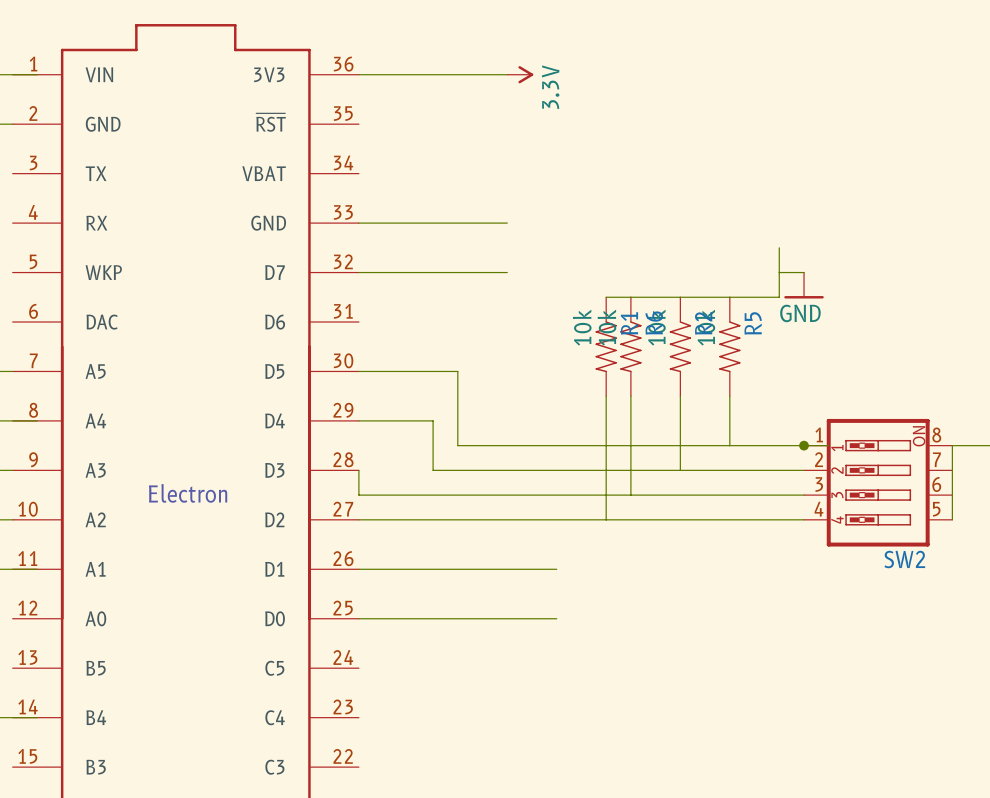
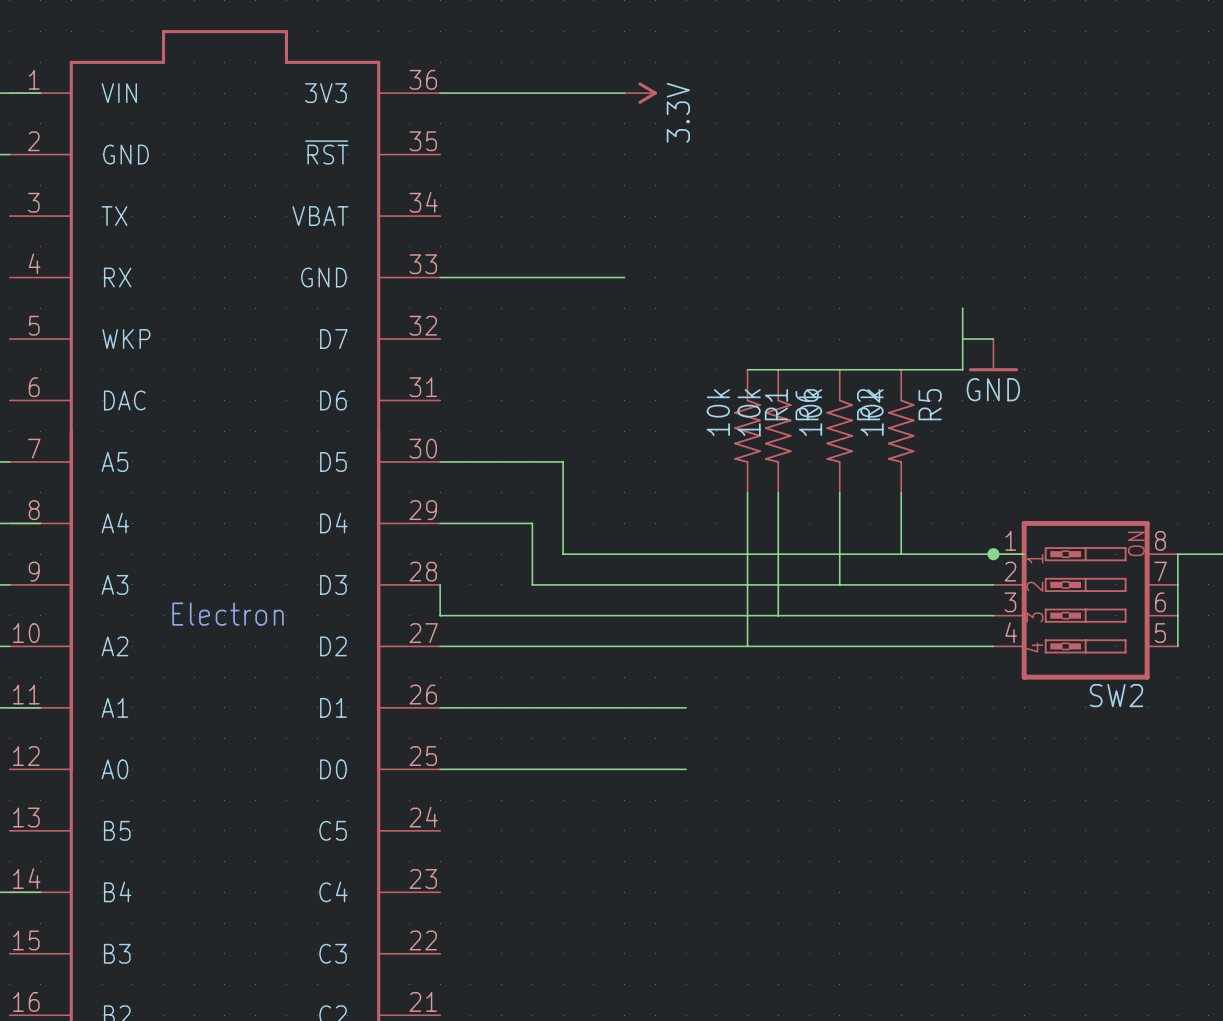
wire: (358, 272) (507, 272) -> none

